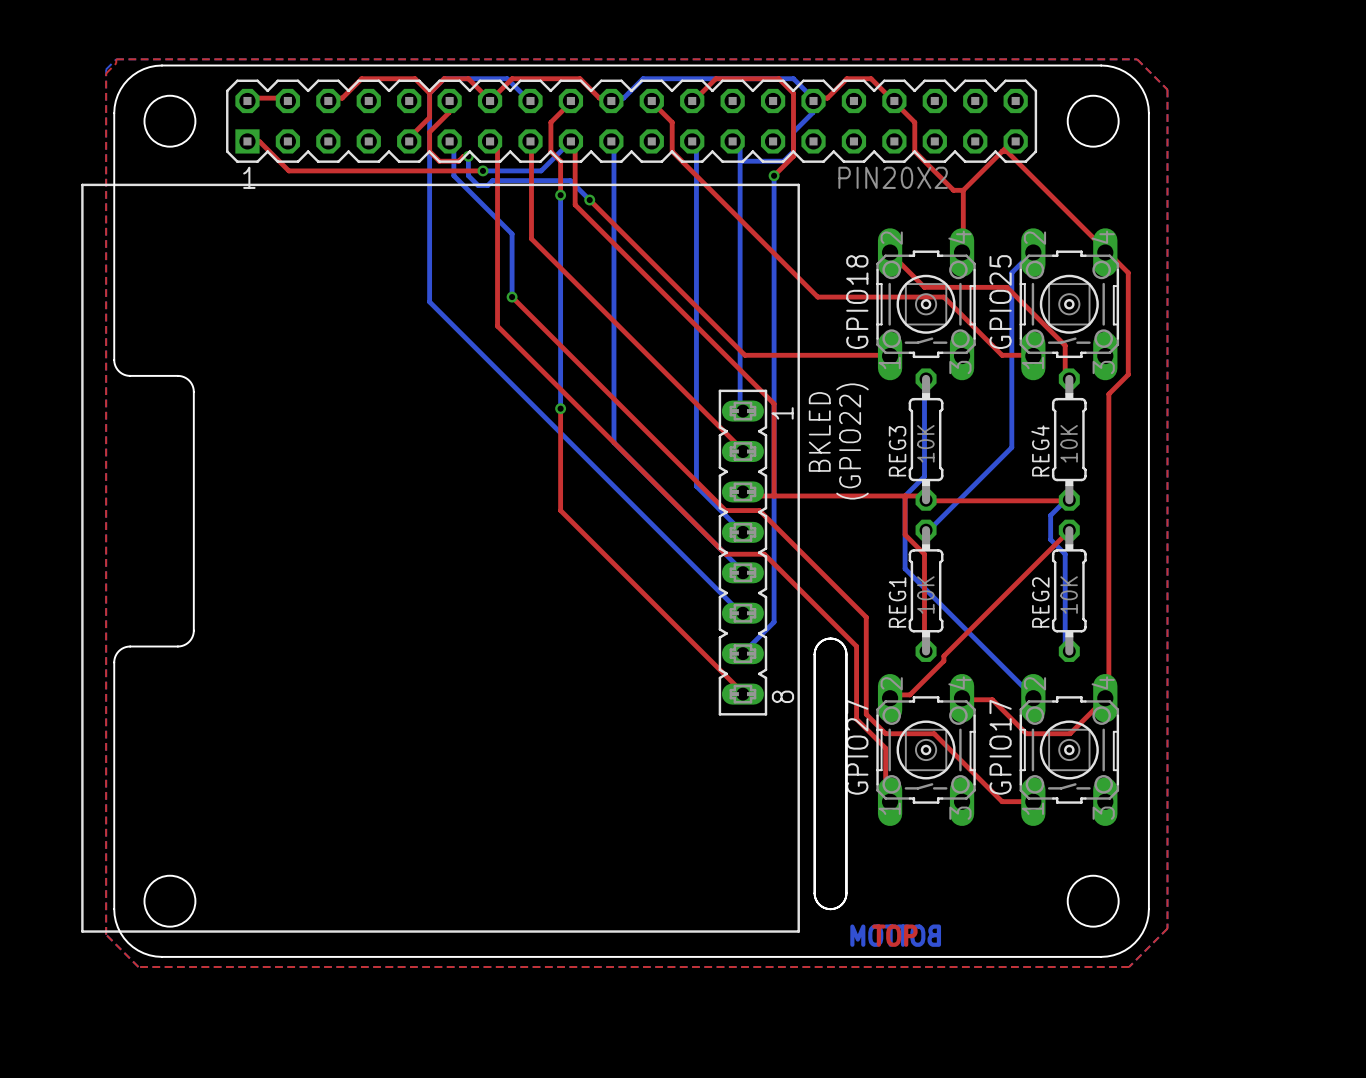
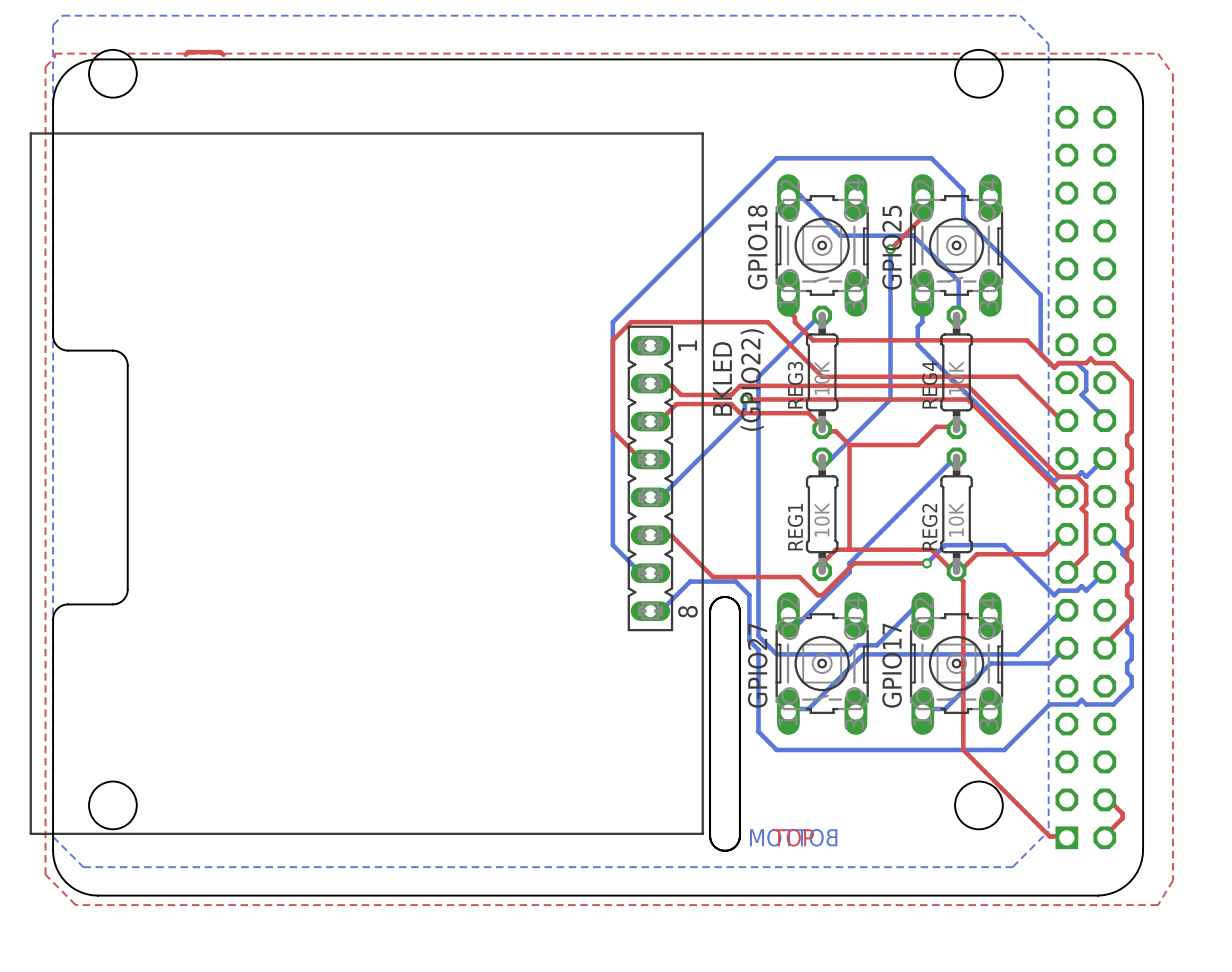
top zone outline: (116, 59) (1137, 59) (1167, 89) (1167, 928) (1129, 967) (138, 967) (106, 934) (106, 73) (116, 63) (116, 59) -> (54, 53) (54, 57) (45, 66) (45, 874) (75, 905) (1158, 905) (1172, 880) (1172, 74) (1158, 53) (54, 53)
board edge: (161, 65) (1101, 65) (1119, 69) (1134, 79) (1145, 94) (1148, 113) (1148, 909) (1145, 927) (1134, 942) (1119, 953) (1101, 956) (161, 956) (143, 953) (128, 942) (117, 927) (114, 909) (114, 658) (120, 649) (128, 646) (184, 645) (190, 640) (193, 630) (193, 387) (187, 379) (179, 376) (124, 374) (117, 369) (114, 359) (114, 107) (120, 89) (132, 75) (149, 67) (161, 65) -> (97, 59) (86, 60) (70, 68) (59, 81) (53, 98) (53, 335) (56, 344) (62, 349) (114, 350) (121, 353) (127, 361) (127, 589) (124, 598) (118, 603) (64, 604) (56, 610) (53, 617) (53, 850) (54, 862) (59, 873) (70, 886) (86, 894) (97, 895) (1098, 895) (1115, 891) (1125, 885) (1134, 876) (1139, 866) (1143, 848) (1143, 102) (1139, 85) (1125, 67) (1115, 62) (1098, 59) (97, 59)
top track: (429, 93) (429, 117) (410, 136) (409, 141) -> none
top track: (429, 93) (444, 78) (468, 78) (490, 101) (512, 78) (580, 78) (599, 98) (609, 98) (611, 101) -> none
top track: (429, 93) (415, 78) (361, 78) (342, 98) (332, 98) (328, 101) -> none
top track: (449, 101) (449, 112) (429, 132) (429, 151) (439, 161) (458, 161) (463, 156) (468, 156) -> none
bottom track: (530, 101) (507, 78) (444, 78) (429, 93) (429, 301) (742, 613) -> none
top track: (570, 101) (550, 122) (550, 151) (560, 161) (560, 195) -> none
bottom track: (611, 101) (613, 98) (623, 98) (643, 78) (793, 78) (813, 101) (812, 112) (793, 132) (793, 151) (783, 161) (740, 161) -> none
top track: (651, 101) (672, 122) (672, 151) (817, 297) (943, 297) (1002, 355) (1033, 356) -> none
top track: (692, 101) (715, 78) (778, 78) (793, 93) (793, 156) (774, 175) -> none
top track: (813, 101) (817, 98) (827, 98) (846, 78) (871, 78) (914, 122) (914, 151) (953, 190) (963, 190) -> none
part: PIN20X2 (631, 121) -> none
top track: (247, 141) (259, 141) (288, 170) (482, 170) -> none
bottom track: (449, 141) (453, 141) (453, 175) (512, 233) (512, 297) -> none
top track: (490, 141) (497, 146) (497, 326) (725, 554) (764, 554) (856, 646) (856, 719) (885, 748) (885, 801) (890, 801) -> none
top track: (530, 141) (531, 238) (742, 451) -> (1066, 572) (1086, 554) (1086, 513) (1081, 508) (1086, 504) (1086, 485) (1077, 476) (1058, 476) (967, 385) (740, 385) (731, 394) (681, 394) (672, 385) (653, 385) (650, 383)
top track: (570, 141) (575, 141) (575, 204) (774, 403) (774, 495) -> none
bottom track: (570, 141) (541, 170) (482, 170) -> none
bottom track: (611, 141) (613, 141) (613, 442) (742, 572) -> (744, 399) (744, 413) (662, 495) (653, 495) (650, 497)
bottom track: (692, 141) (696, 141) (696, 486) (742, 532) -> none
bottom track: (732, 141) (740, 146) (740, 408) (742, 411) -> none
top track: (1015, 141) (1011, 141) (963, 190) -> none
top track: (1002, 151) (1006, 151) (1104, 248) (1105, 252) (1108, 253) (1128, 272) (1128, 374) (1108, 394) (1108, 694) (1070, 733) (1026, 733) (992, 699) (962, 698) -> none
bottom track: (468, 156) (468, 175) (478, 185) (487, 185) (492, 180) (570, 180) (589, 200) -> none
via: (468, 156) -> none
via: (482, 170) -> none
bottom track: (774, 175) (774, 622) (742, 653) -> (1104, 420) (1104, 417) (1081, 394) (1086, 390) (1086, 372) (1077, 363) (1058, 363) (1054, 367) (1040, 354) (1040, 294) (963, 217) (963, 190) (931, 158) (776, 158) (612, 322) (612, 545) (640, 572) (650, 573)
via: (774, 175) -> none
top track: (963, 190) (962, 252) -> none
bottom track: (560, 195) (560, 408) -> none
via: (560, 195) -> none
top track: (589, 200) (744, 355) (890, 356) -> (1104, 648) (1108, 645) (1108, 640) (1131, 617) (1131, 599) (1127, 595) (1127, 586) (1131, 581) (1131, 563) (1127, 558) (1127, 549) (1131, 545) (1131, 522) (1127, 517) (1127, 508) (1131, 504) (1131, 485) (1127, 481) (1127, 472) (1131, 467) (1131, 449) (1127, 445) (1127, 435) (1131, 431) (1131, 381) (1113, 363) (1095, 363) (1090, 358) (1086, 363) (1058, 363) (1054, 367) (1027, 340) (813, 340) (794, 322) (794, 317) (790, 313) (790, 294) (788, 294)
via: (589, 200) -> none
top track: (890, 252) (924, 287) (1006, 287) (1065, 345) (1065, 374) (1069, 378) -> none
bottom track: none -> (788, 196) (790, 194) (799, 194) (840, 235) (913, 235) (958, 281) (958, 313) (956, 315)
top track: none -> (922, 196) (922, 217) (890, 249)
bottom track: (1033, 252) (1011, 272) (1011, 447) (929, 529) (926, 530) -> (890, 249) (890, 399) (831, 458) (822, 457)
top track: (512, 297) (725, 510) (759, 510) (866, 617) (866, 714) (885, 733) (934, 733) (1002, 801) (1033, 801) -> none
via: (512, 297) -> none
via: none -> (890, 249)
bottom track: none -> (922, 294) (922, 322) (917, 326) (917, 344) (1054, 481) (1058, 476) (1077, 476) (1081, 472) (1086, 476) (1104, 458)
bottom track: (926, 378) (924, 379) (924, 476) (905, 495) (905, 568) (1028, 691) -> (822, 315) (817, 317) (758, 376) (758, 636) (776, 654) (849, 654) (858, 645) (876, 645) (913, 608) (917, 608)
top track: (560, 408) (560, 510) (742, 694) -> none
via: (560, 408) -> none
top track: none -> (744, 399) (967, 399) (1058, 490) (1063, 490) (1067, 495) (1066, 496)
via: none -> (744, 399)
top track: none -> (1066, 420) (1063, 422) (1017, 376) (822, 376) (767, 322) (631, 322) (612, 340) (612, 431) (640, 458) (650, 459)
top track: (742, 491) (744, 495) (924, 495) (926, 500) (929, 500) (1069, 500) -> (650, 421) (653, 417) (662, 417) (676, 404) (731, 404) (740, 413) (808, 413) (817, 422) (822, 422) (822, 431) (835, 431) (849, 445)
top track: (905, 495) (905, 534) (924, 554) (924, 651) (926, 651) -> (1066, 837) (1049, 836) (963, 749) (963, 581) (931, 549) (835, 549) (822, 563) (822, 571)
top track: none -> (956, 429) (954, 426) (936, 426) (917, 445) (849, 445)
bottom track: (1069, 500) (1065, 500) (1050, 515) (1050, 539) (1065, 554) (1065, 651) (1069, 651) -> none
top track: none -> (849, 445) (849, 549)
top track: (1069, 530) (943, 656) (943, 660) (909, 694) (890, 694) (890, 698) -> none
bottom track: none -> (956, 457) (849, 563) (849, 572) (799, 622) (794, 622) (788, 615)
part: none -> (1085, 477)
top track: none -> (1066, 534) (1045, 554) (976, 554) (958, 572) (954, 572)
bottom track: none -> (1104, 534) (1108, 540) (1113, 540) (1122, 549) (1122, 554) (1131, 563) (1131, 581) (1127, 586) (1127, 595) (1131, 599) (1131, 617) (1127, 622) (1127, 631) (1131, 636) (1131, 658) (1127, 663) (1127, 672) (1131, 677) (1131, 686) (1113, 704) (1086, 704) (1081, 699) (1077, 704) (1049, 704) (1004, 749) (776, 749) (758, 731) (758, 649) (749, 640) (749, 595) (735, 581) (690, 581) (662, 608) (653, 608) (650, 611)
top track: none -> (650, 535) (672, 536) (712, 577) (799, 577) (817, 595) (822, 595) (854, 563) (926, 563)
board edge: (830, 638) (819, 643) (814, 654) -> (725, 596) (714, 601) (710, 611)
board edge: (830, 638) (841, 643) (846, 654) -> (725, 596) (735, 601) (739, 611)
board edge: (830, 638) (841, 643) (846, 654) -> (725, 596) (735, 601) (739, 611)
board edge: (830, 638) (819, 643) (814, 654) -> (725, 596) (714, 601) (710, 611)
bottom track: none -> (926, 563) (945, 545) (1004, 545) (1054, 595) (1058, 590) (1077, 590) (1081, 586) (1086, 590) (1104, 572)
via: none -> (926, 563)
board edge: (814, 654) (814, 893) -> (710, 611) (710, 835)
board edge: (846, 654) (846, 893) -> (739, 611) (739, 835)
bottom track: none -> (1066, 610) (1063, 608) (1017, 654) (863, 654) (808, 709) (790, 709) (788, 712)
bottom track: none -> (1066, 648) (1063, 645) (1058, 649) (1058, 654) (1049, 663) (990, 663) (945, 709) (926, 709) (922, 712)
board edge: (814, 893) (819, 904) (830, 909) -> (710, 835) (714, 846) (725, 850)
board edge: (814, 893) (819, 904) (830, 909) -> (710, 835) (714, 846) (725, 850)
board edge: (846, 893) (841, 904) (830, 909) -> (739, 835) (735, 846) (725, 850)
board edge: (846, 893) (841, 904) (830, 909) -> (739, 835) (735, 846) (725, 850)
top track: none -> (1104, 799) (1108, 804) (1113, 804) (1122, 813) (1122, 818) (1108, 831) (1108, 836) (1104, 837)

